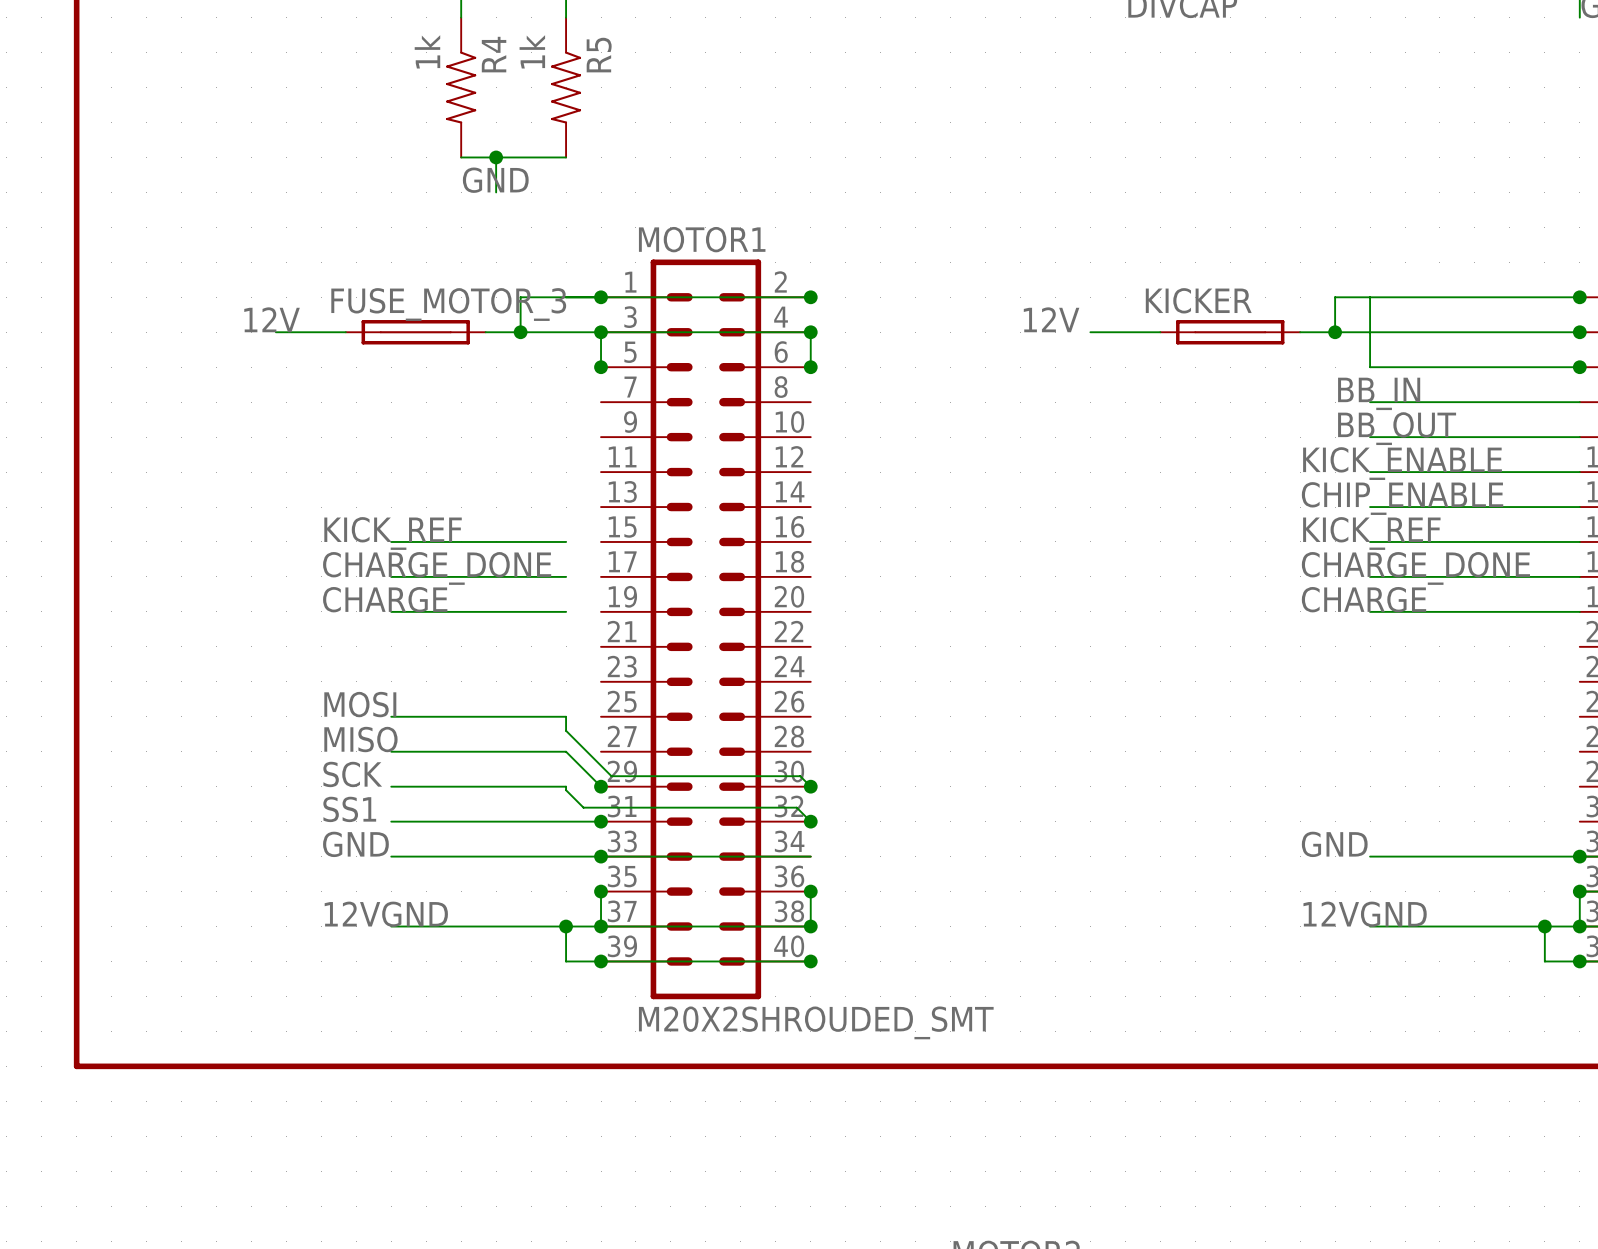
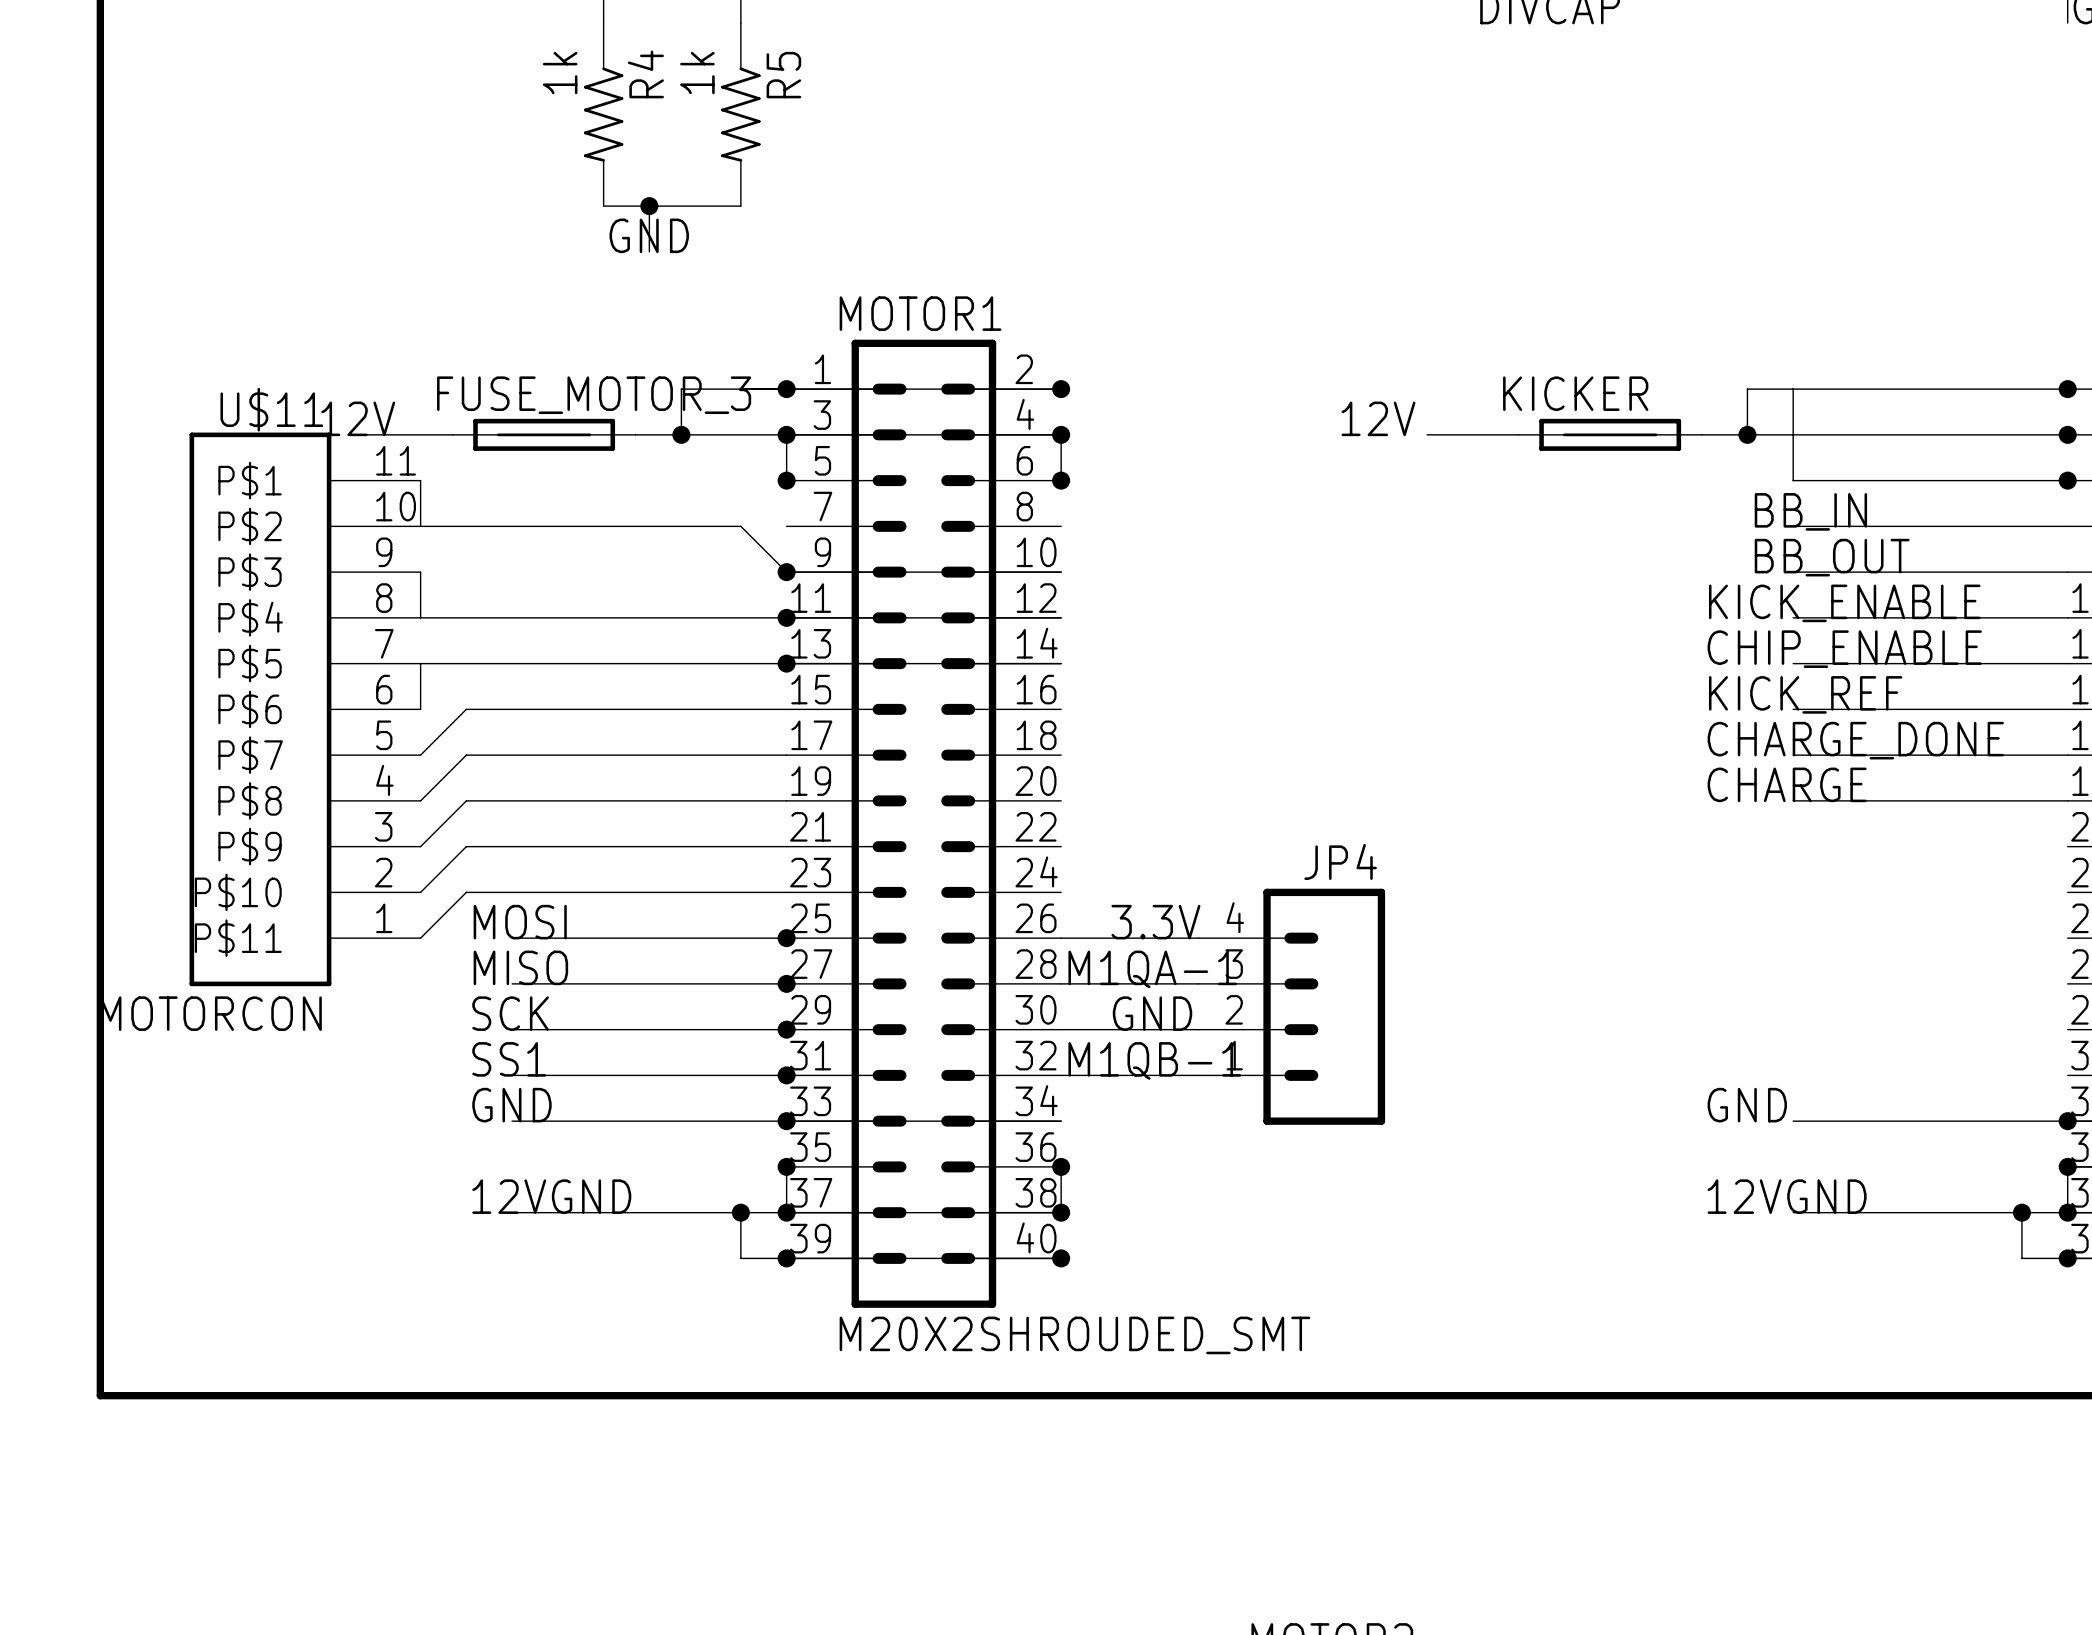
wire: none -> (420, 480) (420, 526) (740, 526) (786, 572) (1061, 572)
wire: none -> (420, 572) (420, 617) (1061, 617)
junction: none -> (786, 572)
junction: none -> (786, 617)
junction: none -> (786, 663)
wire: none -> (1061, 663) (420, 663) (420, 709)
label: KICK_REF (393, 533) -> none
U$11: none -> MOTORCON (305, 709)
wire: none -> (512, 709) (466, 709) (420, 755)
wire: none -> (740, 709) (786, 709)
label: CHARGE_DONE (437, 568) -> none
wire: none -> (512, 755) (466, 755) (420, 800)
wire: none -> (740, 755) (786, 755)
label: CHARGE (385, 599) -> none
wire: none -> (512, 800) (466, 800) (420, 846)
wire: none -> (740, 800) (786, 800)
wire: none -> (786, 846) (466, 846) (420, 892)
wire: none -> (786, 892) (466, 892) (420, 938)
label position: MOSI (360, 704) -> MOSI (520, 922)
label: none -> 3.3V (1155, 922)
wire: (566, 716) (566, 730) (611, 776) (800, 776) (810, 786) -> (740, 938) (786, 938)
junction: none -> (786, 938)
wire: none -> (1061, 938) (1198, 938)
label position: MISO (360, 739) -> MISO (520, 967)
label: none -> M1QA-1 (1152, 969)
wire: (566, 751) (601, 786) -> (740, 983) (786, 983)
junction: none -> (786, 983)
wire: none -> (1061, 983) (1198, 983)
JP4: none -> (1291, 1006)
label position: SCK (352, 774) -> SCK (510, 1013)
label: none -> GND (1152, 1013)
wire: (566, 786) (566, 790) (583, 807) (796, 807) (810, 821) -> (740, 1029) (786, 1029)
wire: none -> (1061, 1029) (1198, 1029)
junction: (810, 786) -> none
label position: SS1 (349, 809) -> SS1 (509, 1059)
label: none -> M1QB-1 (1154, 1060)
wire: none -> (1061, 1075) (1198, 1075)
junction: (810, 821) -> none
label position: GND (355, 844) -> GND (511, 1105)
label position: 12VGND (386, 914) -> 12VGND (551, 1196)

